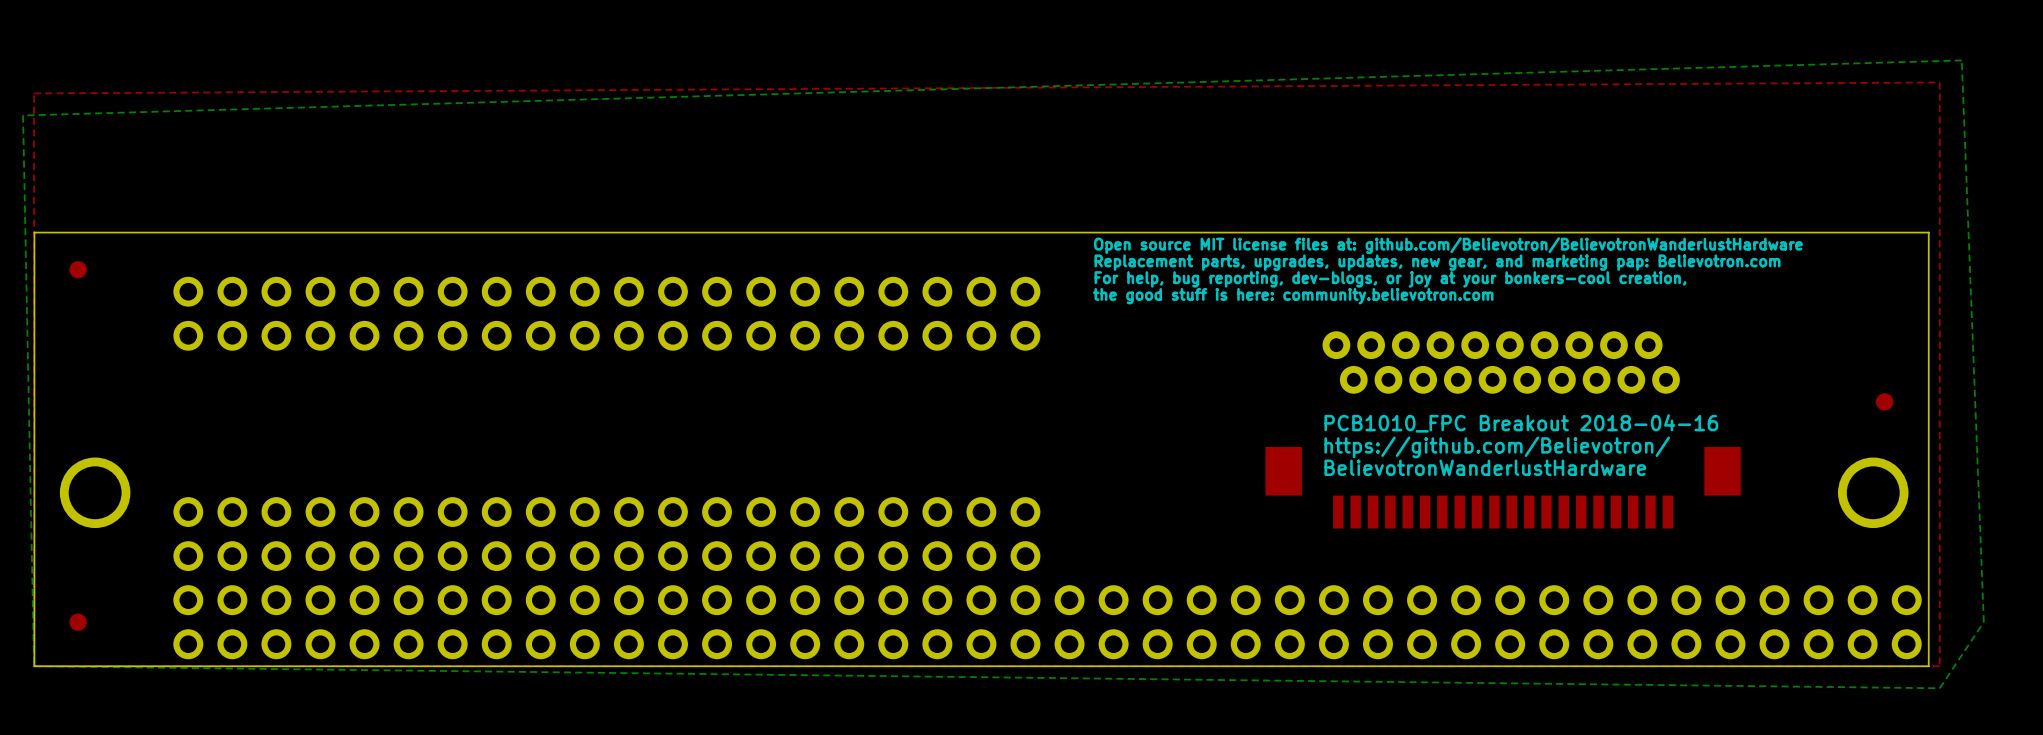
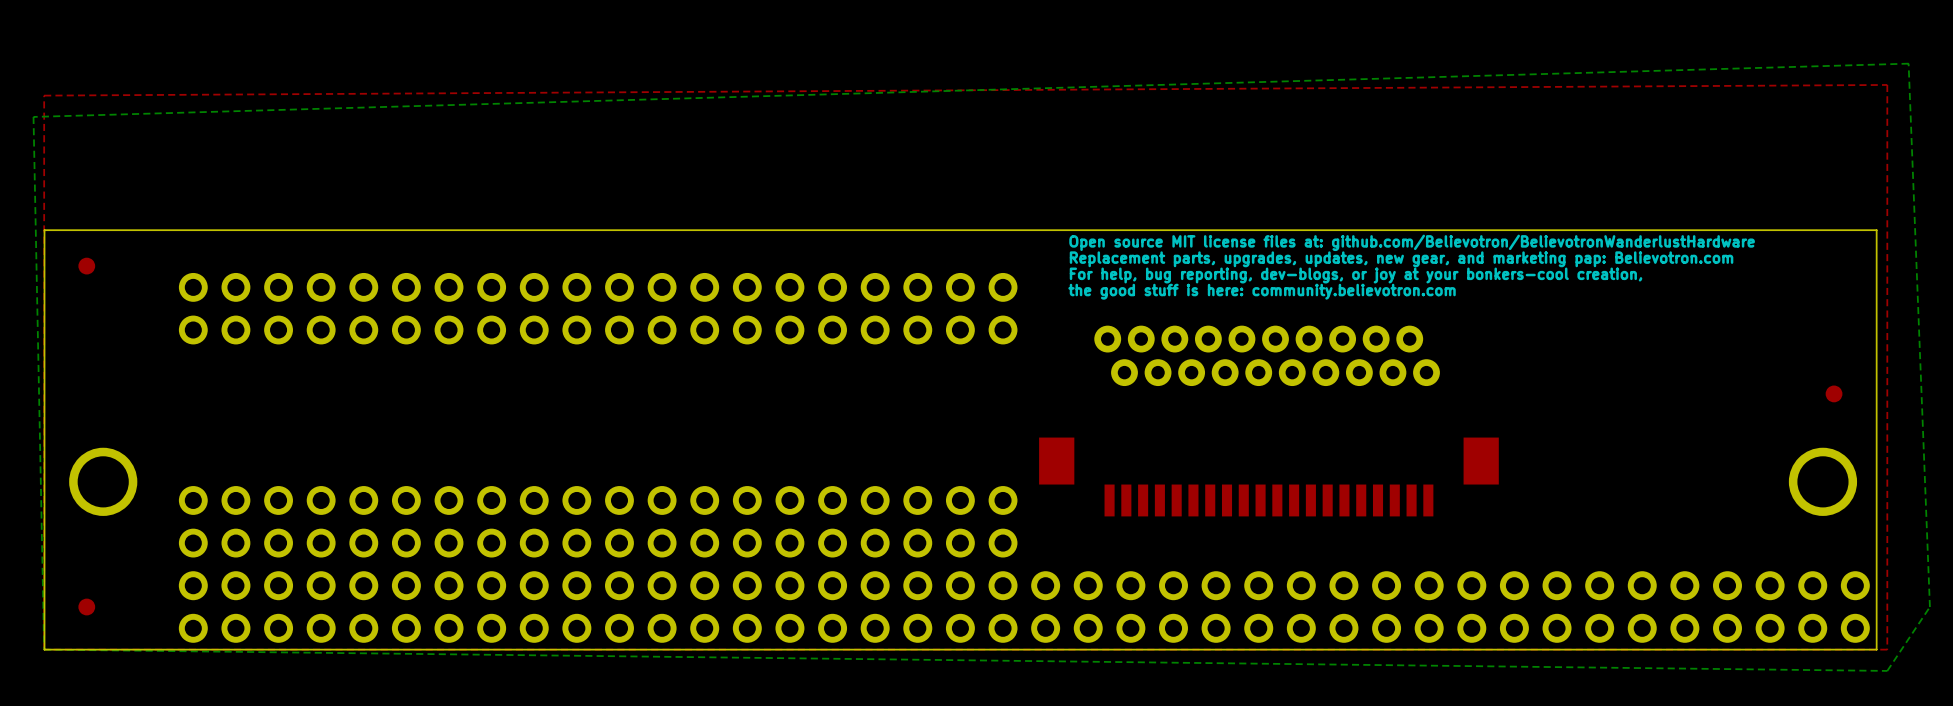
part position: (1501, 362) -> (1267, 355)
text: PCB1010_FPC Breakout 2018-04-16 (1521, 423) -> none
text: https://github.com/Believotron/ (1497, 447) -> none
text: BelievotronWanderlustHardware (1485, 467) -> none
part position: (1503, 487) -> (1268, 476)

